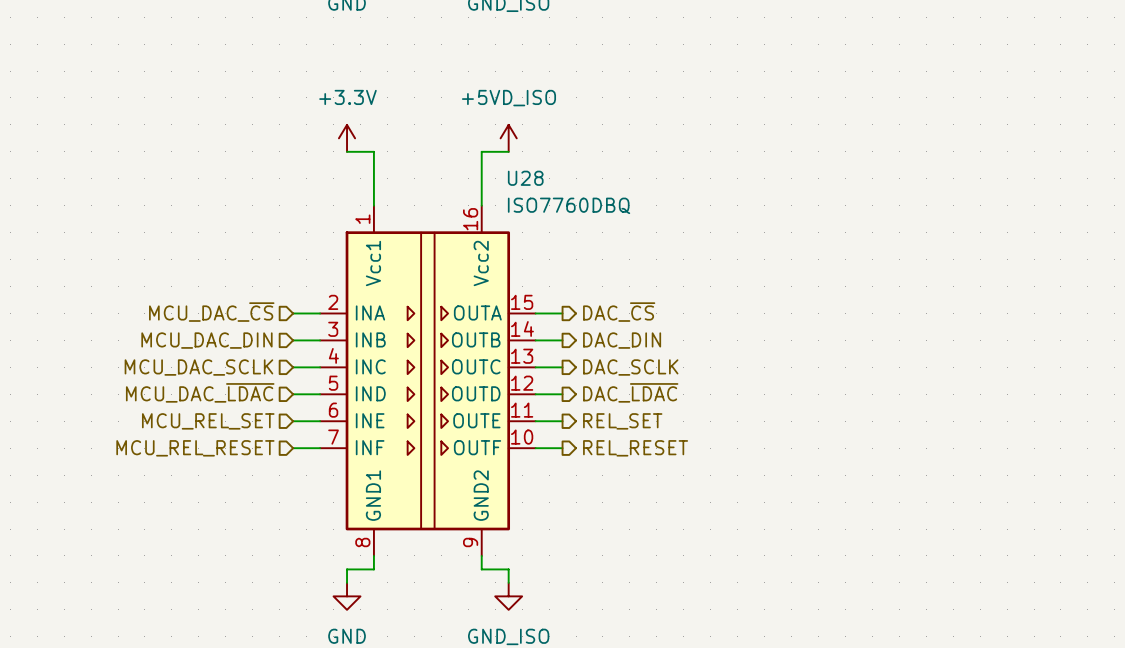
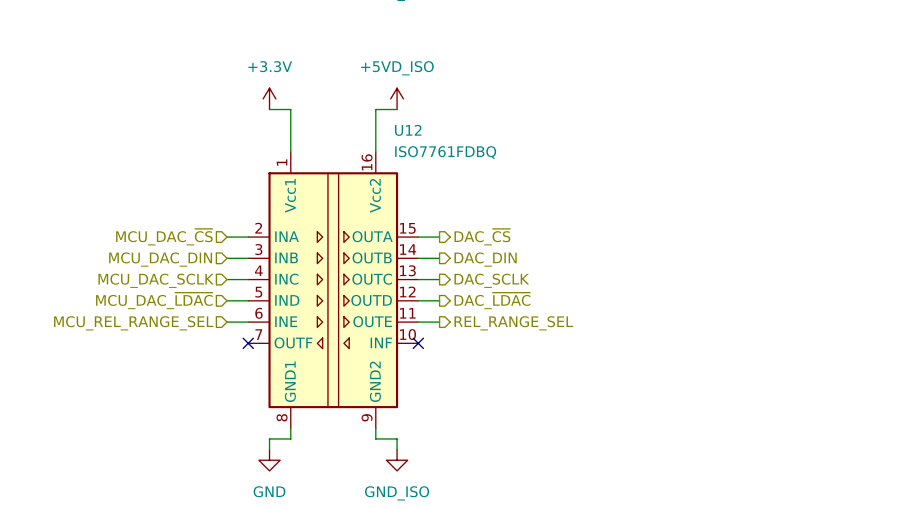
U28: ISO7760DBQ (427, 380) -> none
U12: none -> ISO7761FDBQ (333, 290)
hierarchical label: MCU_REL_SET (208, 421) -> MCU_REL_RANGE_SEL (133, 323)
hierarchical label: REL_SET (622, 421) -> REL_RANGE_SEL (513, 323)
hierarchical label: MCU_REL_RESET (195, 448) -> none
wire: (293, 448) (320, 448) -> none
no-connect mark: none -> (248, 343)
wire: (535, 448) (562, 448) -> none
no-connect mark: none -> (418, 343)
hierarchical label: REL_RESET (635, 448) -> none

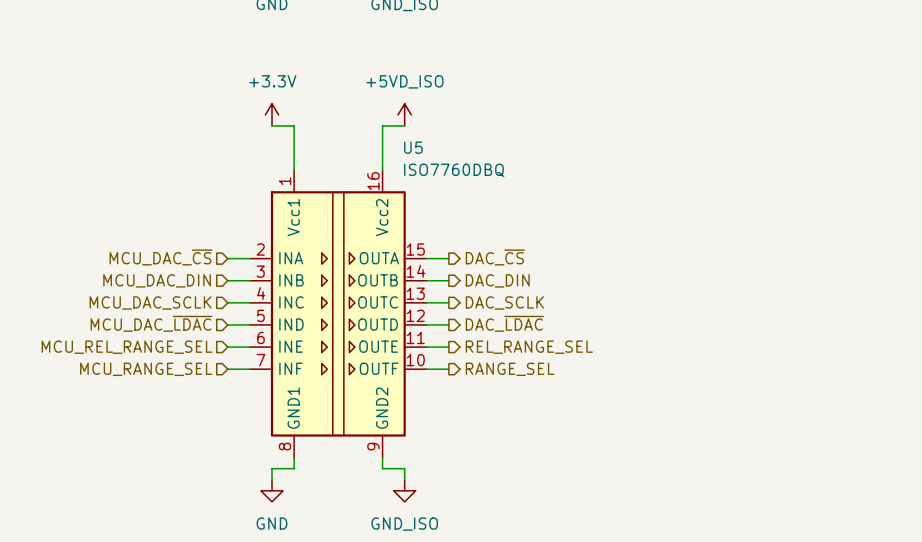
U12: ISO7761FDBQ (333, 290) -> none
U5: none -> ISO7760DBQ (338, 313)
wire: none -> (227, 369) (249, 369)
no-connect mark: (248, 343) -> none
wire: none -> (426, 369) (448, 369)
no-connect mark: (418, 343) -> none
hierarchical label: none -> MCU_RANGE_SEL (146, 369)
hierarchical label: none -> RANGE_SEL (510, 369)

